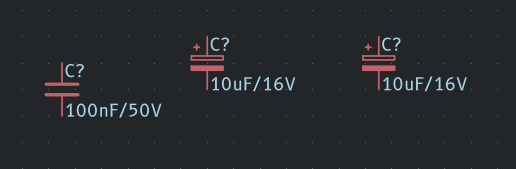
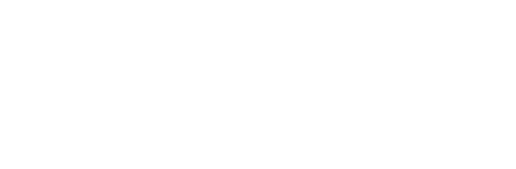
C?: 10uF/16V (207, 63) -> none
C?: 10uF/16V (378, 63) -> none
C?: 100nF/50V (62, 89) -> none

